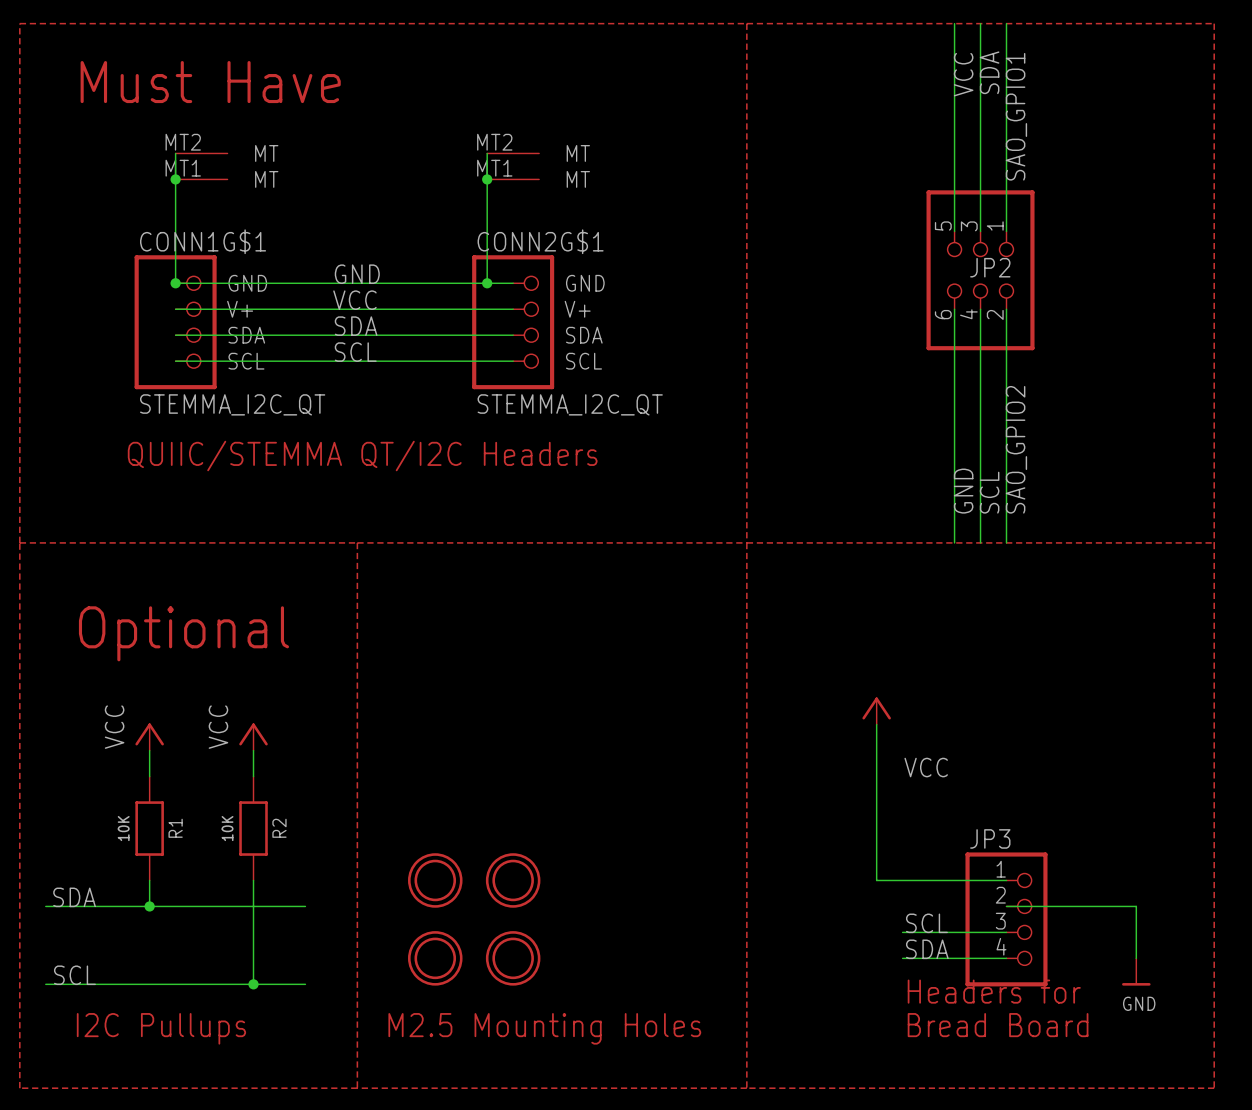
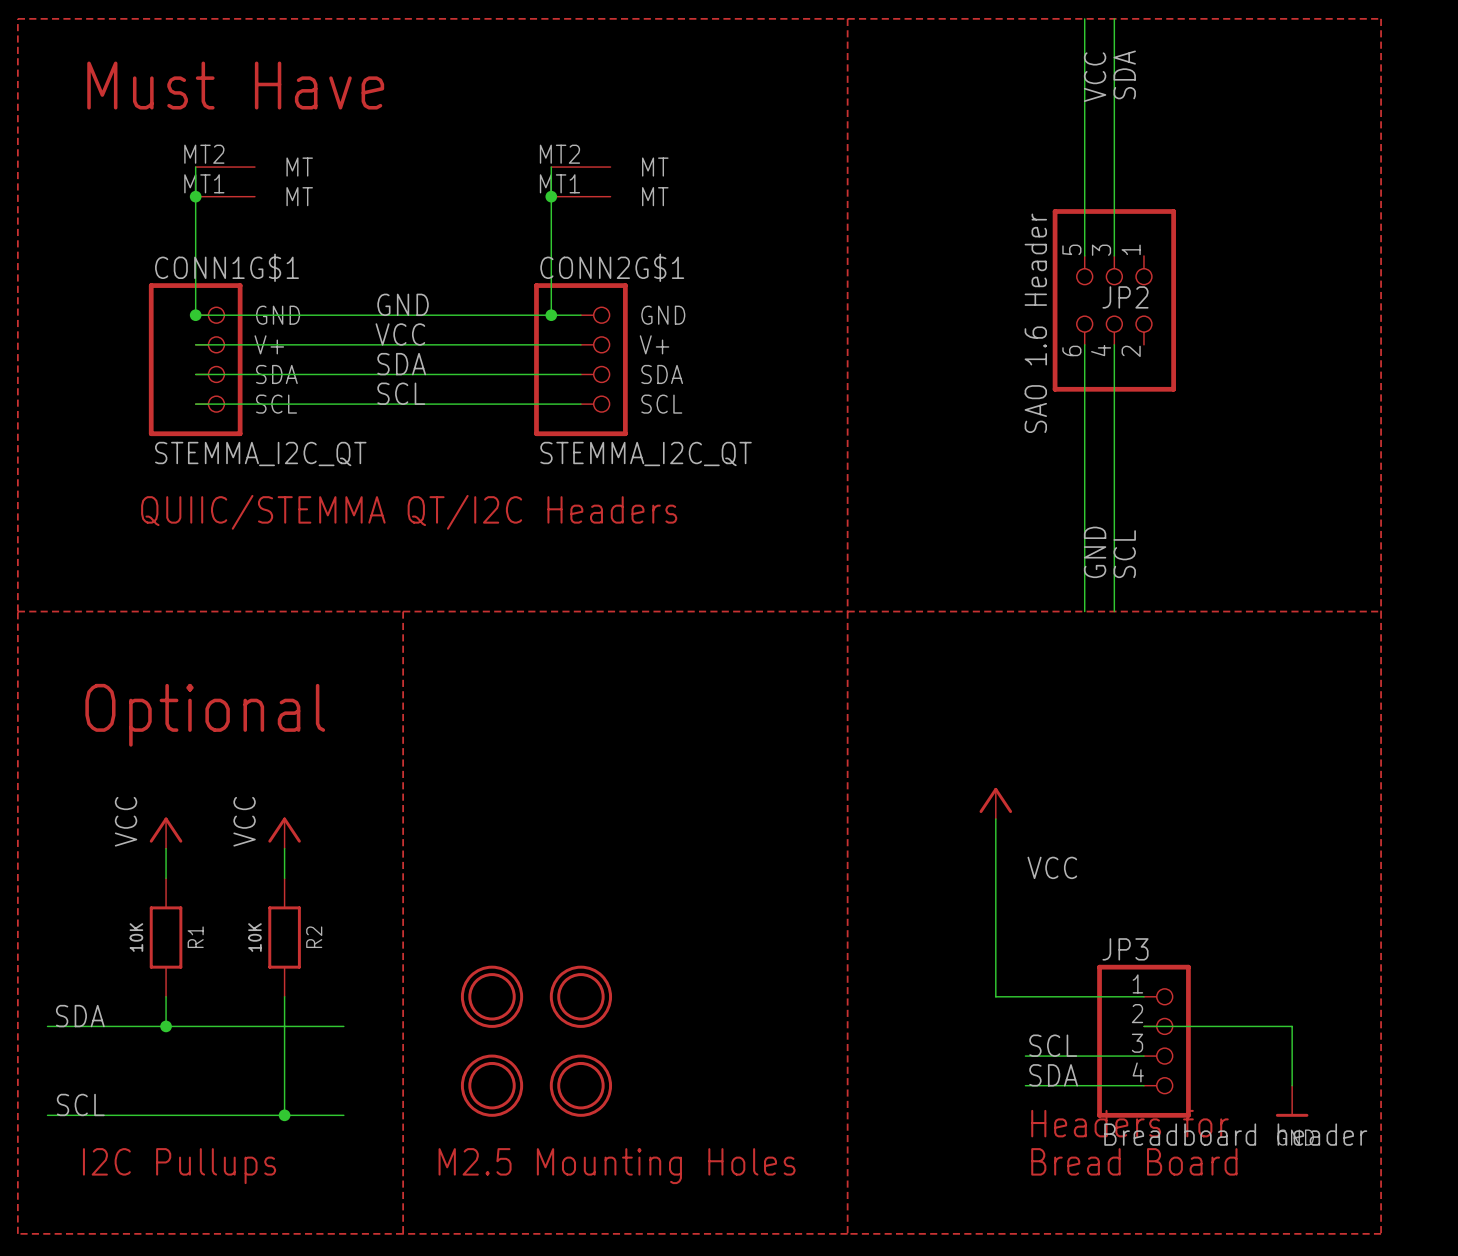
wire: (1006, 23) (1006, 231) -> none
label: SAO_GPIO1 (1016, 116) -> none
JP2 value: none -> SAO 1.6 Header (1035, 323)
wire: (1006, 309) (1006, 542) -> none
label: SAO_GPIO2 (1016, 449) -> none
JP3 value: none -> Breadboard header (1235, 1134)

